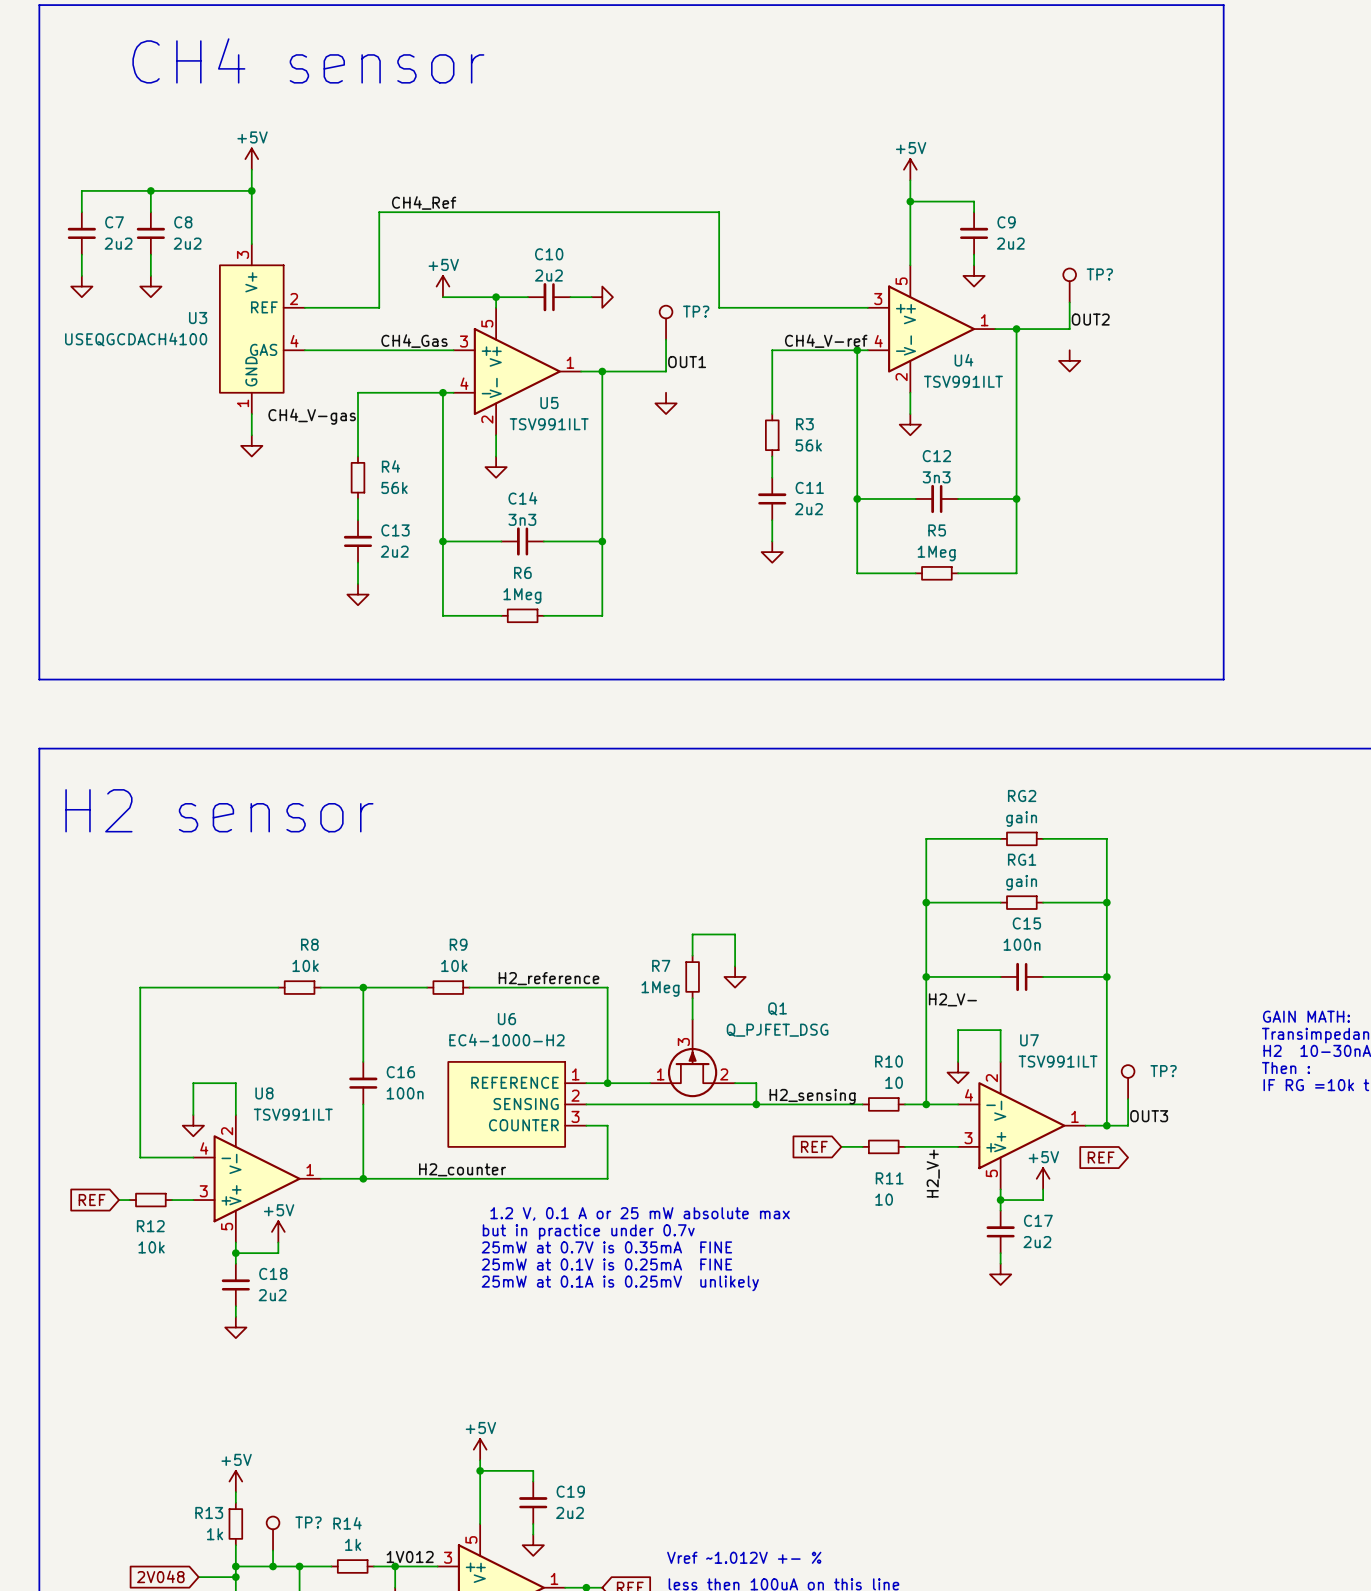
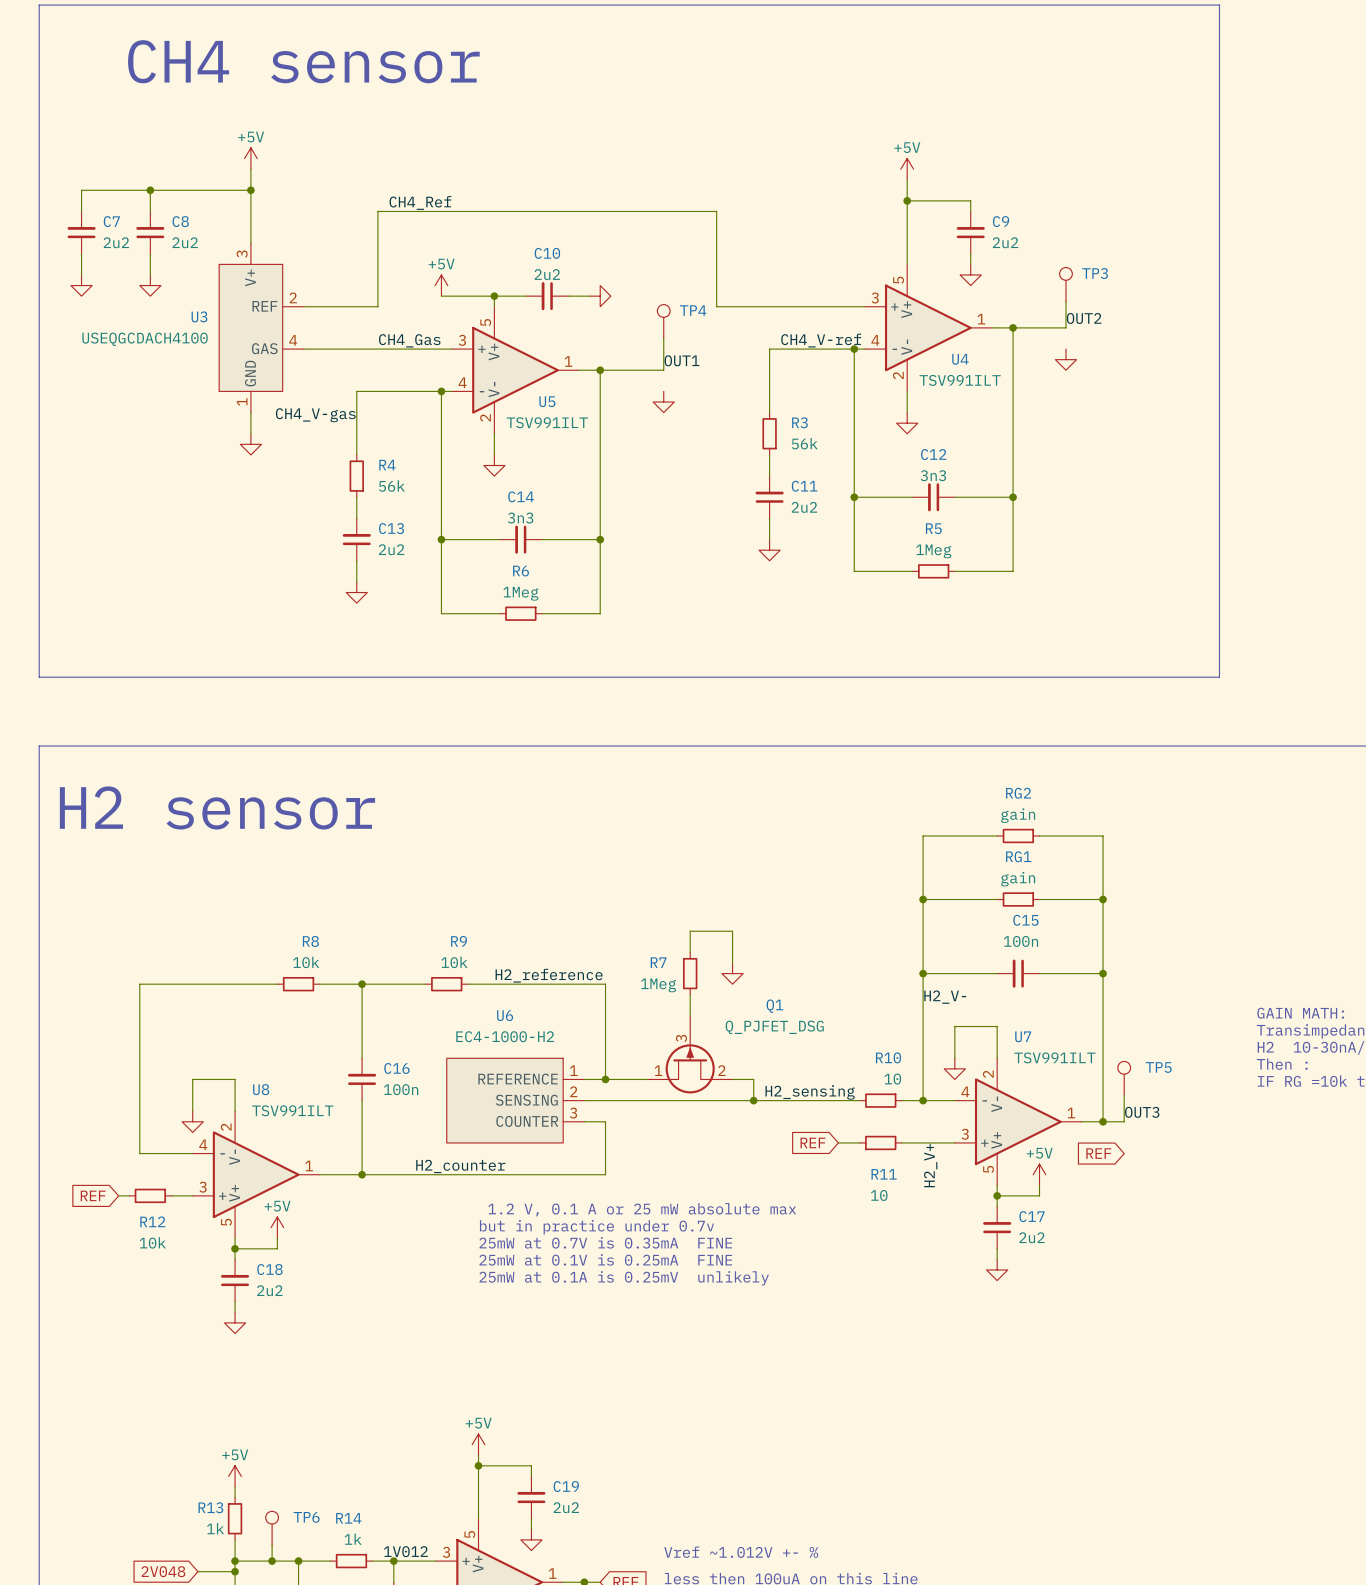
TP? name: TP? (1099, 274) -> TP3 (1095, 273)
TP? name: TP? (696, 311) -> TP4 (693, 310)
TP? name: TP? (1163, 1071) -> TP5 (1158, 1067)
TP? name: TP? (308, 1522) -> TP6 (306, 1517)

